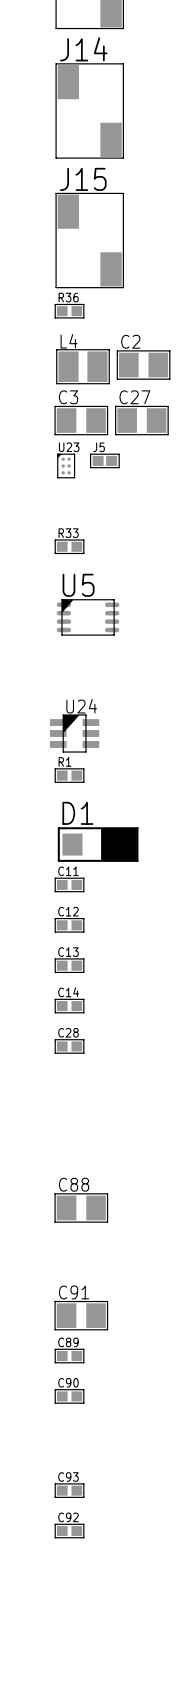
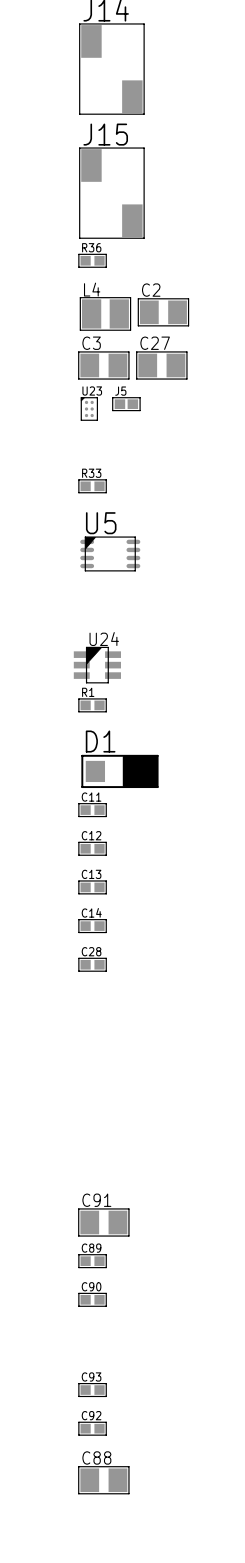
C88 position: (81, 1207) -> (103, 1480)

